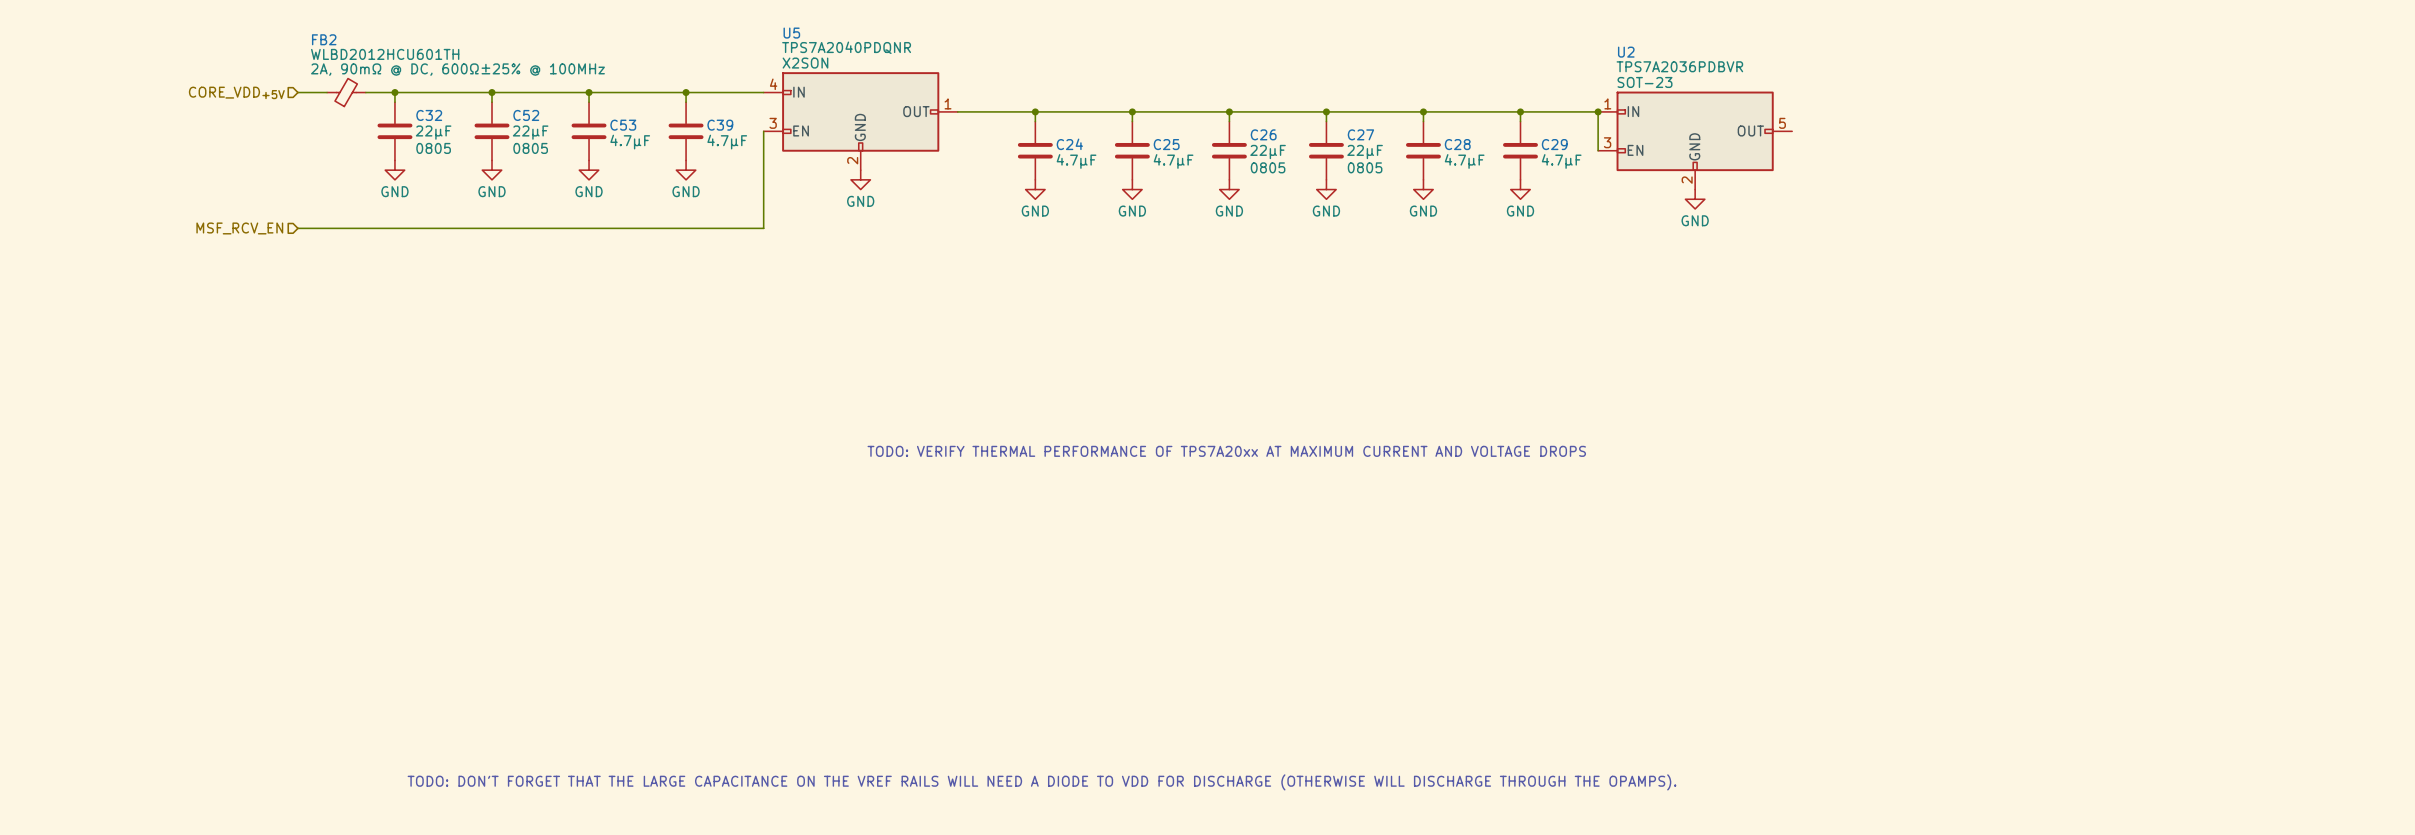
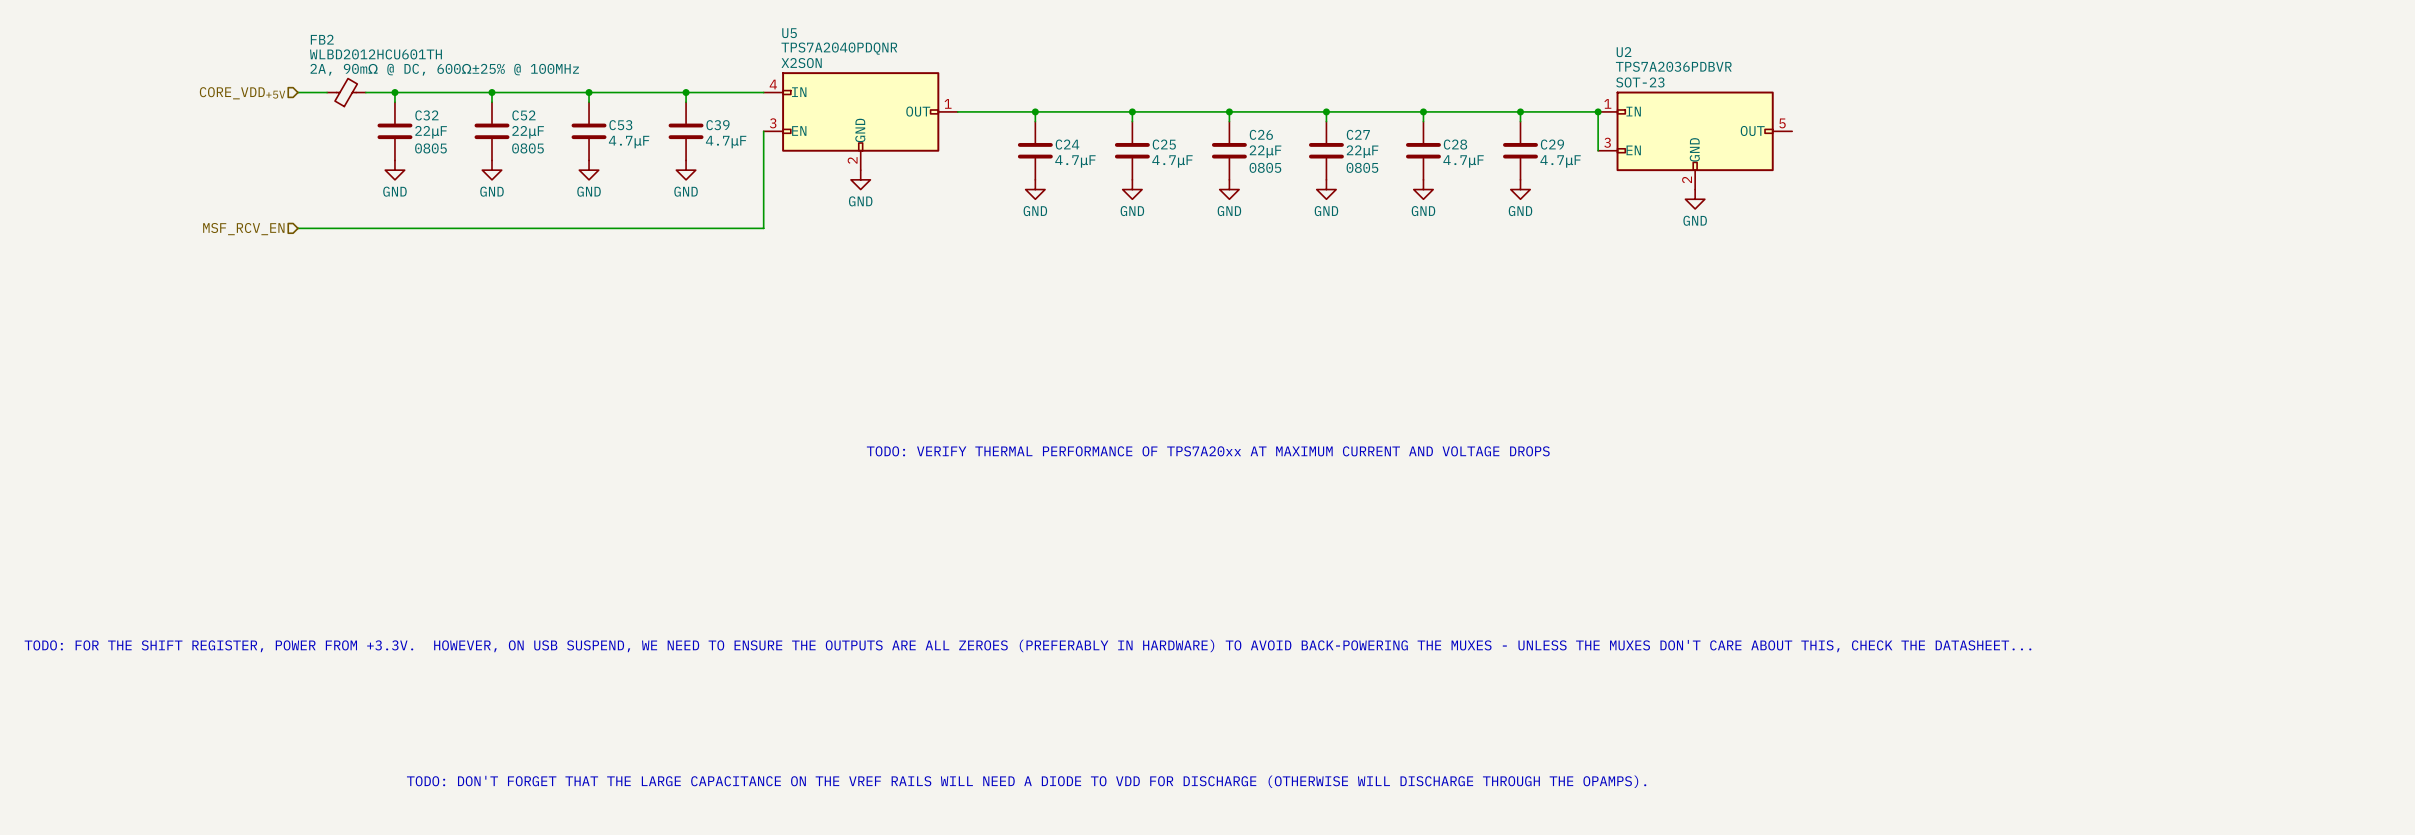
text: none -> TODO: FOR THE SHIFT REGISTER, POWER FROM +3.3V. HOWEVER, ON USB SUSPEND, WE NEED TO ENSURE THE OUTPUTS ARE ALL ZEROES (PREFERABLY IN HARDWARE) TO AVOID BACK-POWERING THE MUXES - UNLESS THE MUXES DON'T CARE ABOUT THIS, CHECK THE DATASHEET... (1028, 645)

